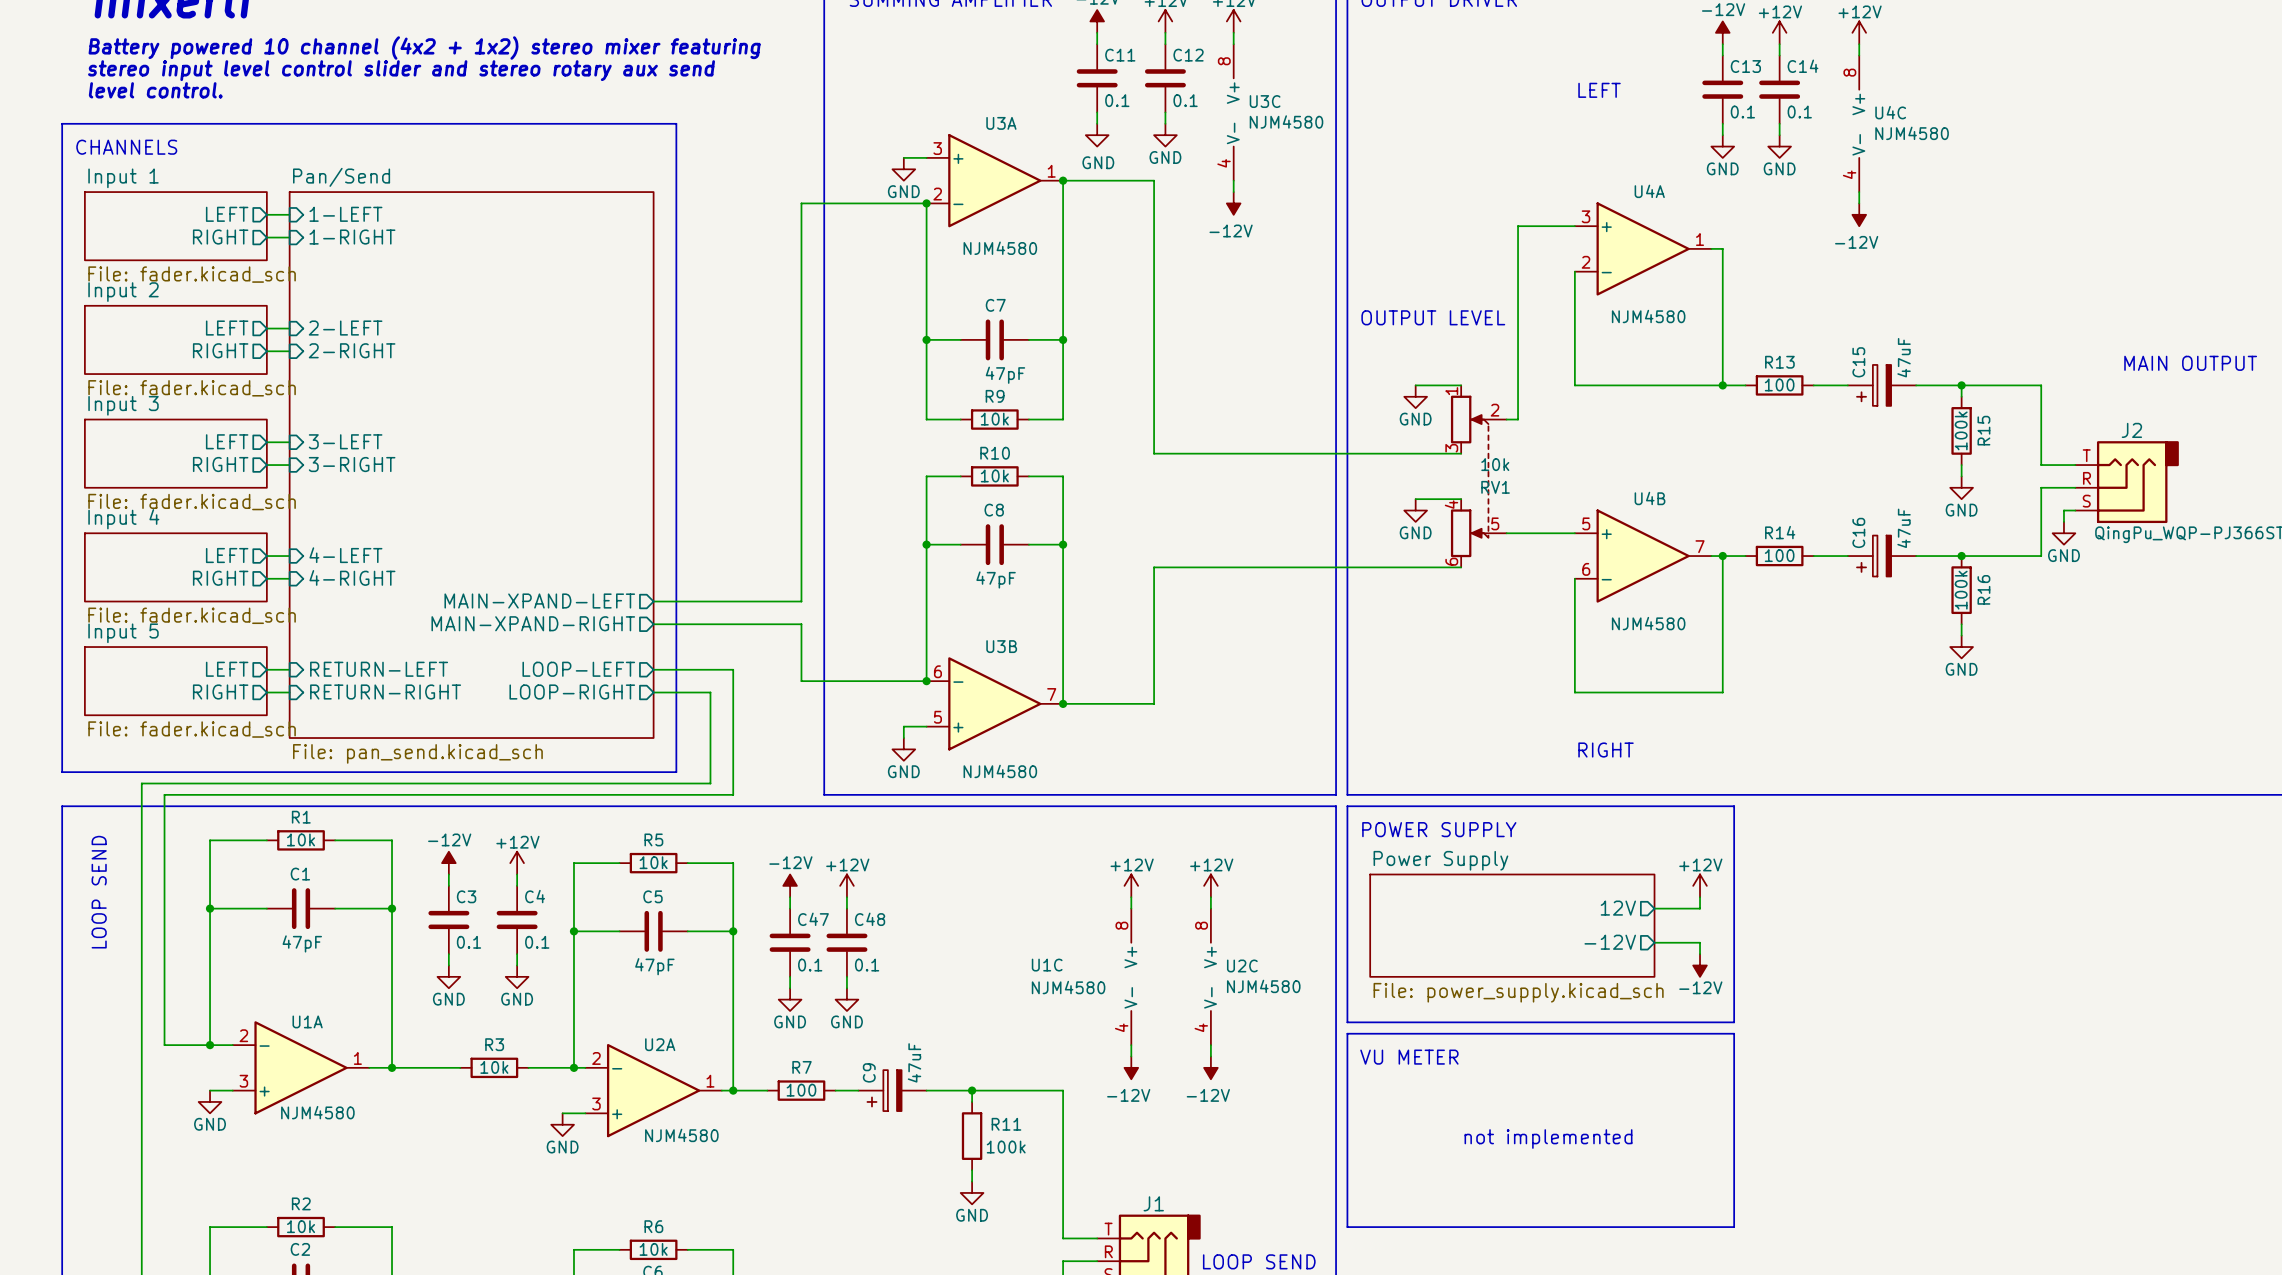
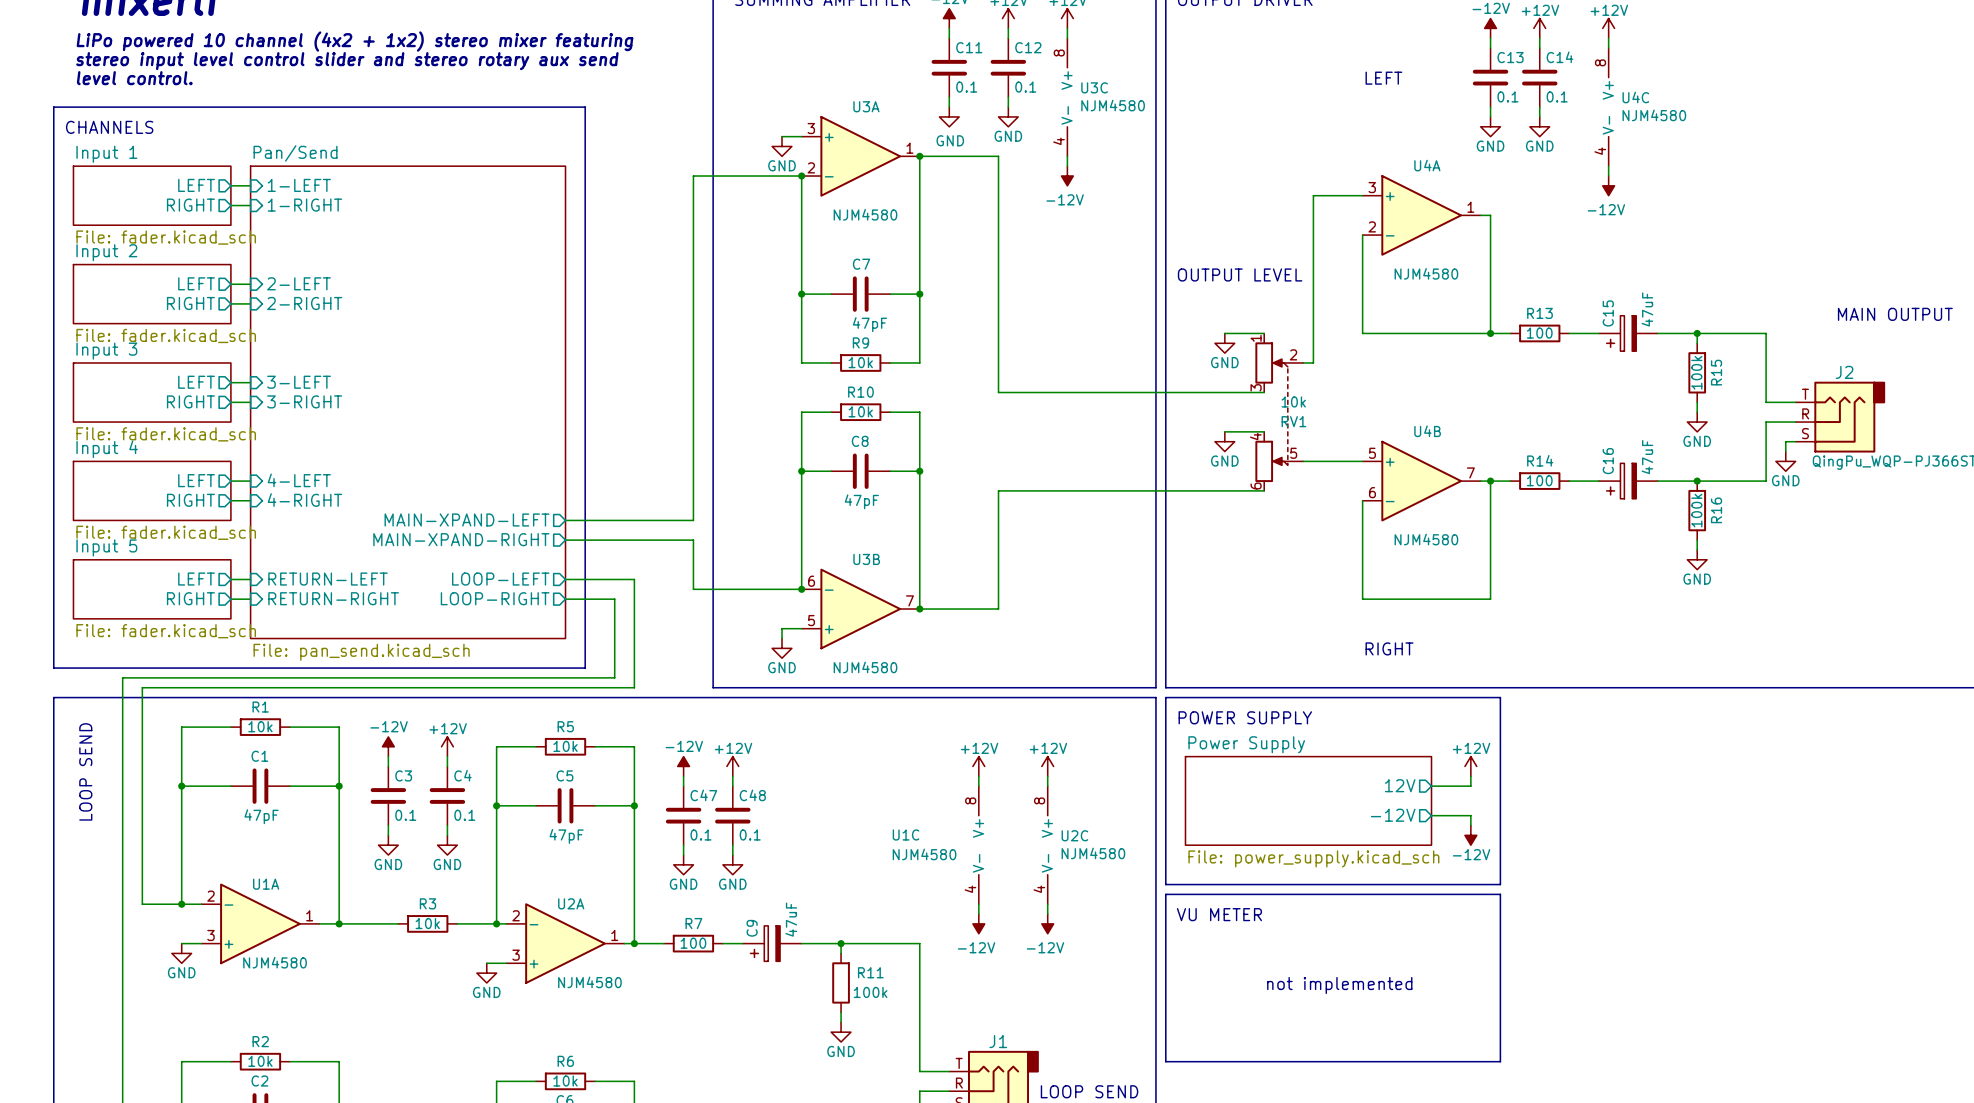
text: Battery powered 10 channel (4x2 + 1x2) stereo mixer featuring (424, 48) -> LiPo powered 10 channel (4x2 + 1x2) stereo mixer featuring (354, 41)

